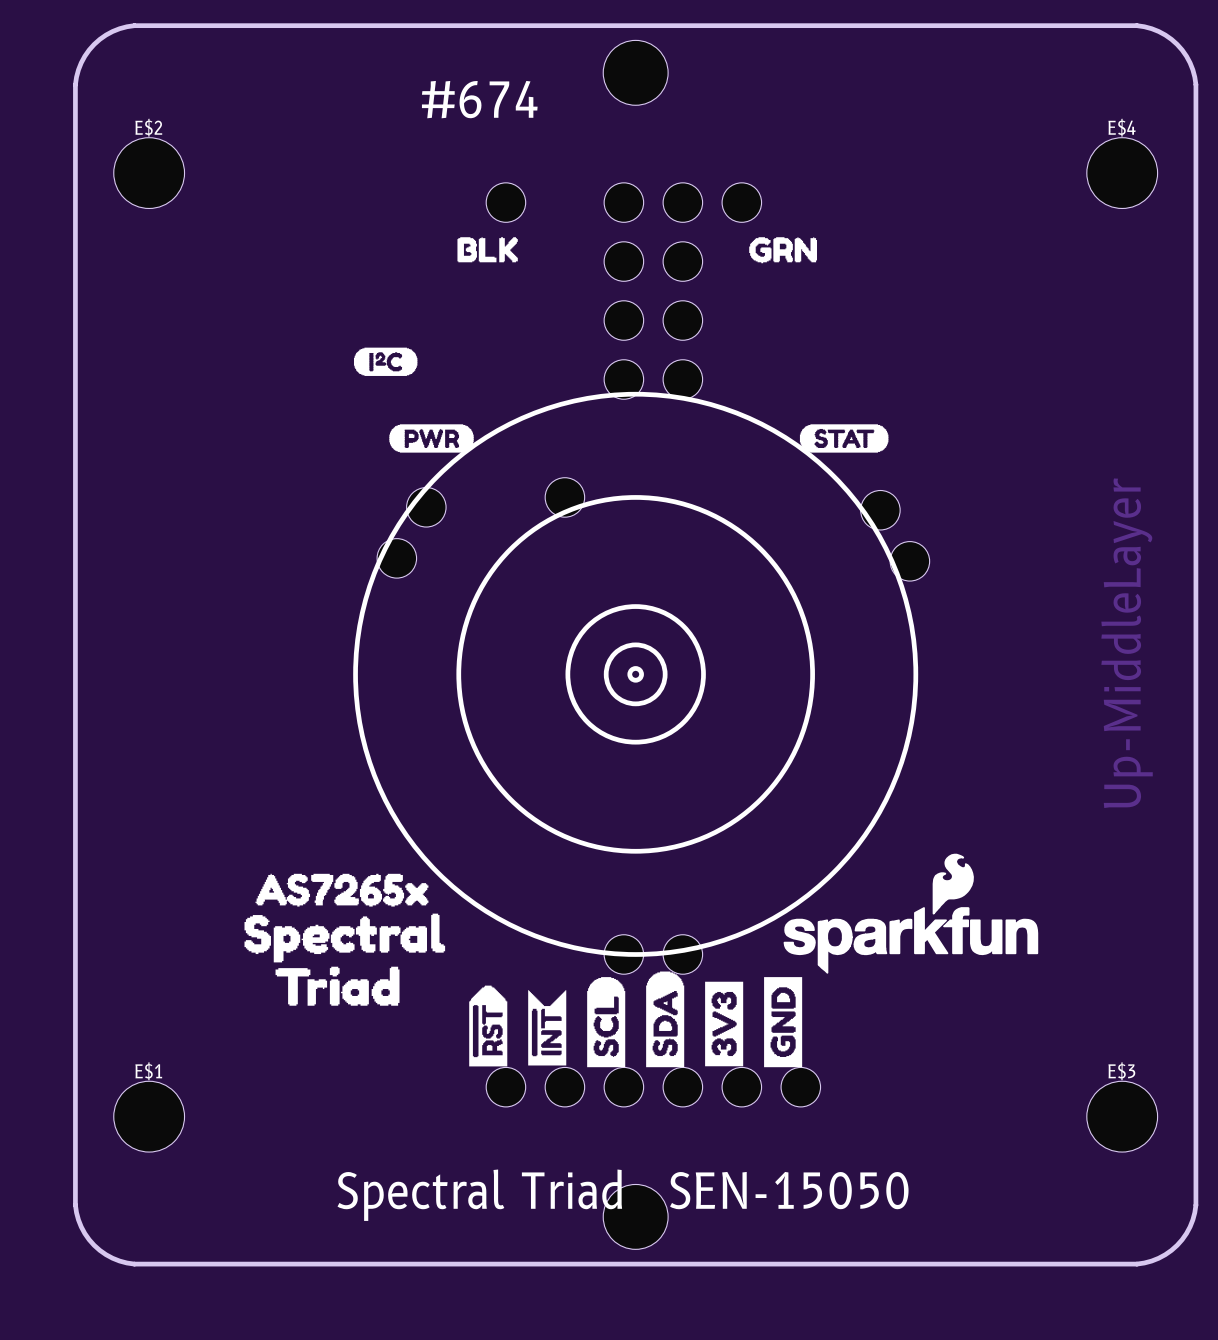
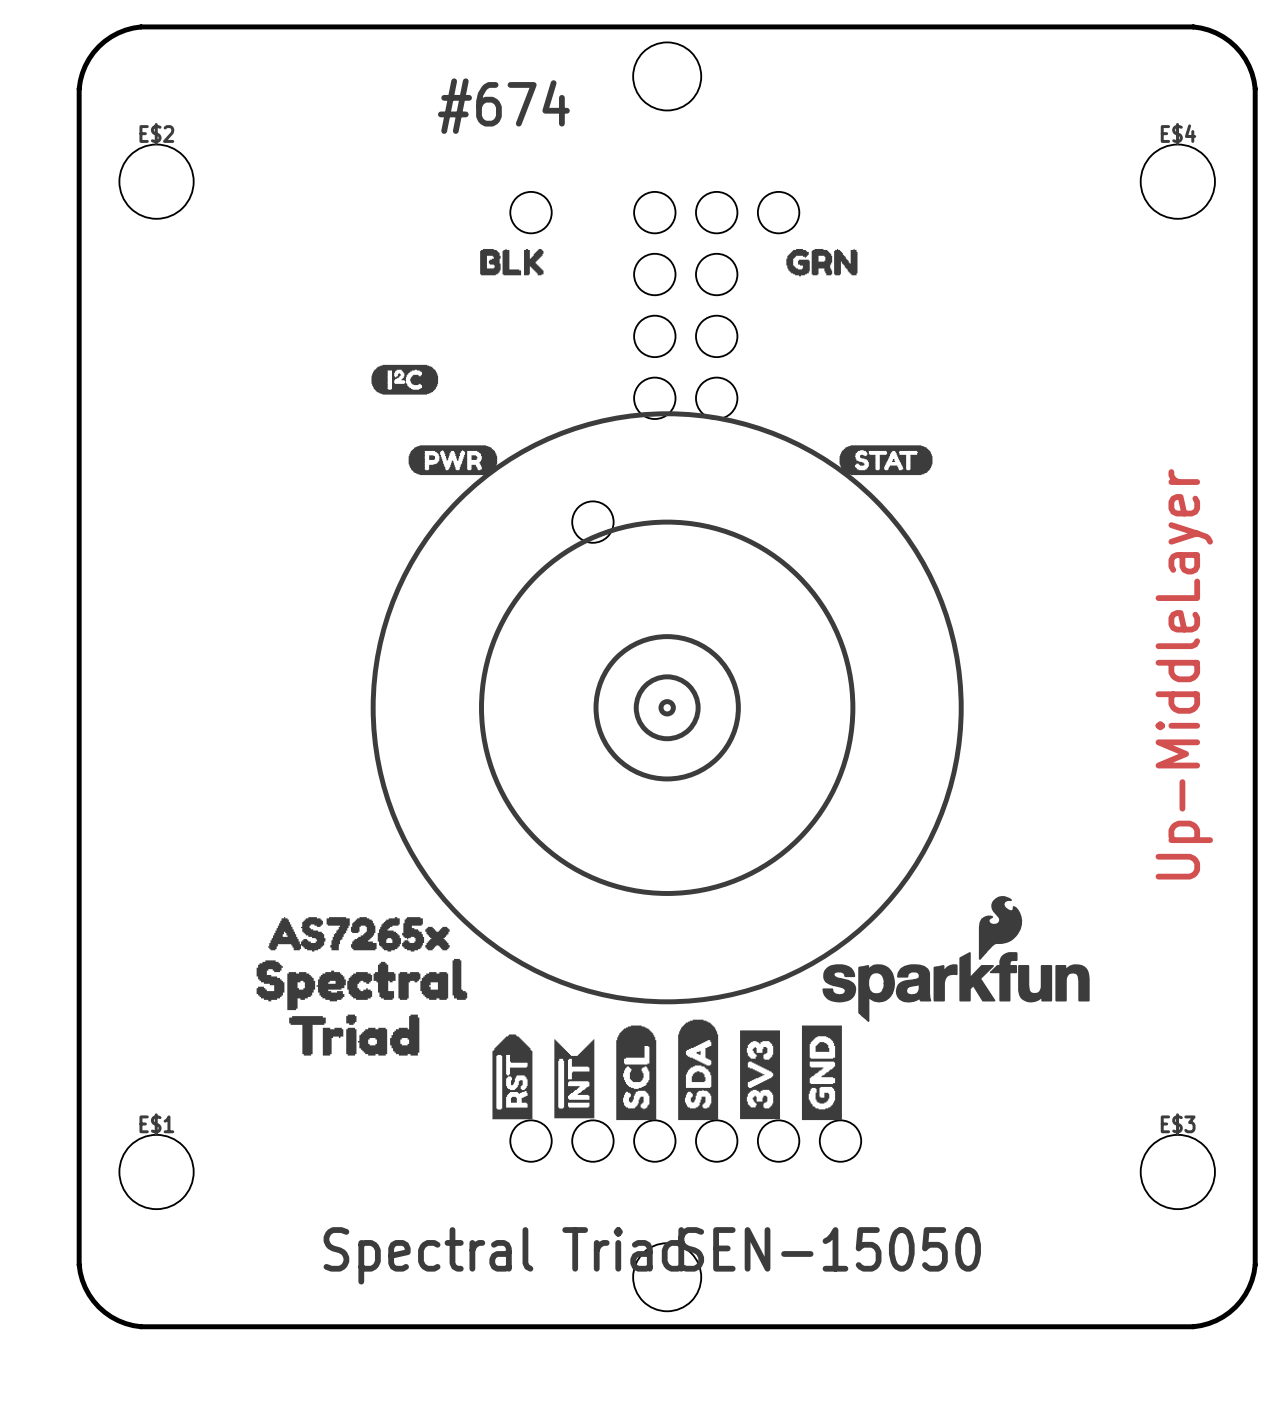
hole: (426, 507) -> none
hole: (880, 510) -> none
hole: (396, 558) -> none
hole: (909, 561) -> none
hole: (623, 954) -> none
hole: (682, 954) -> none

